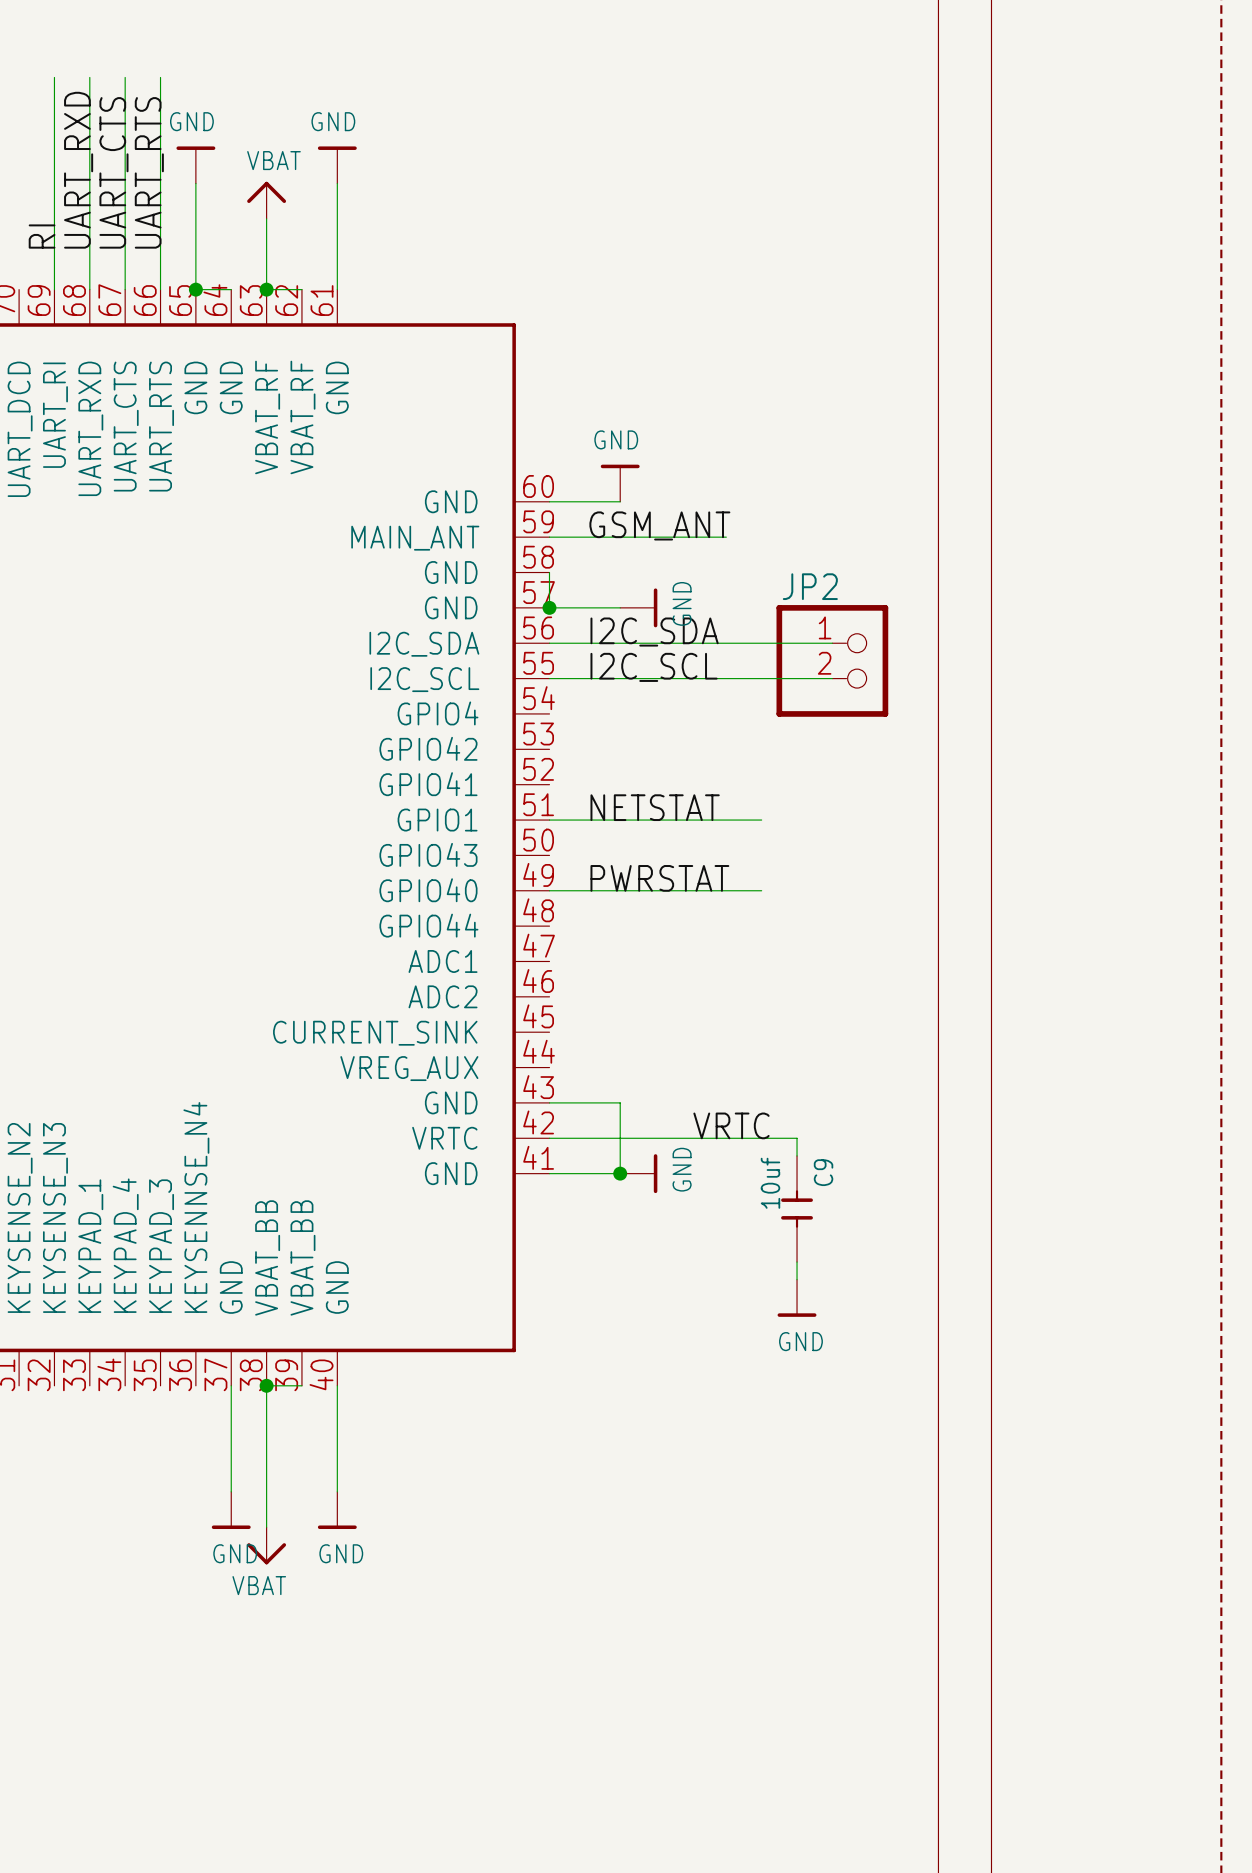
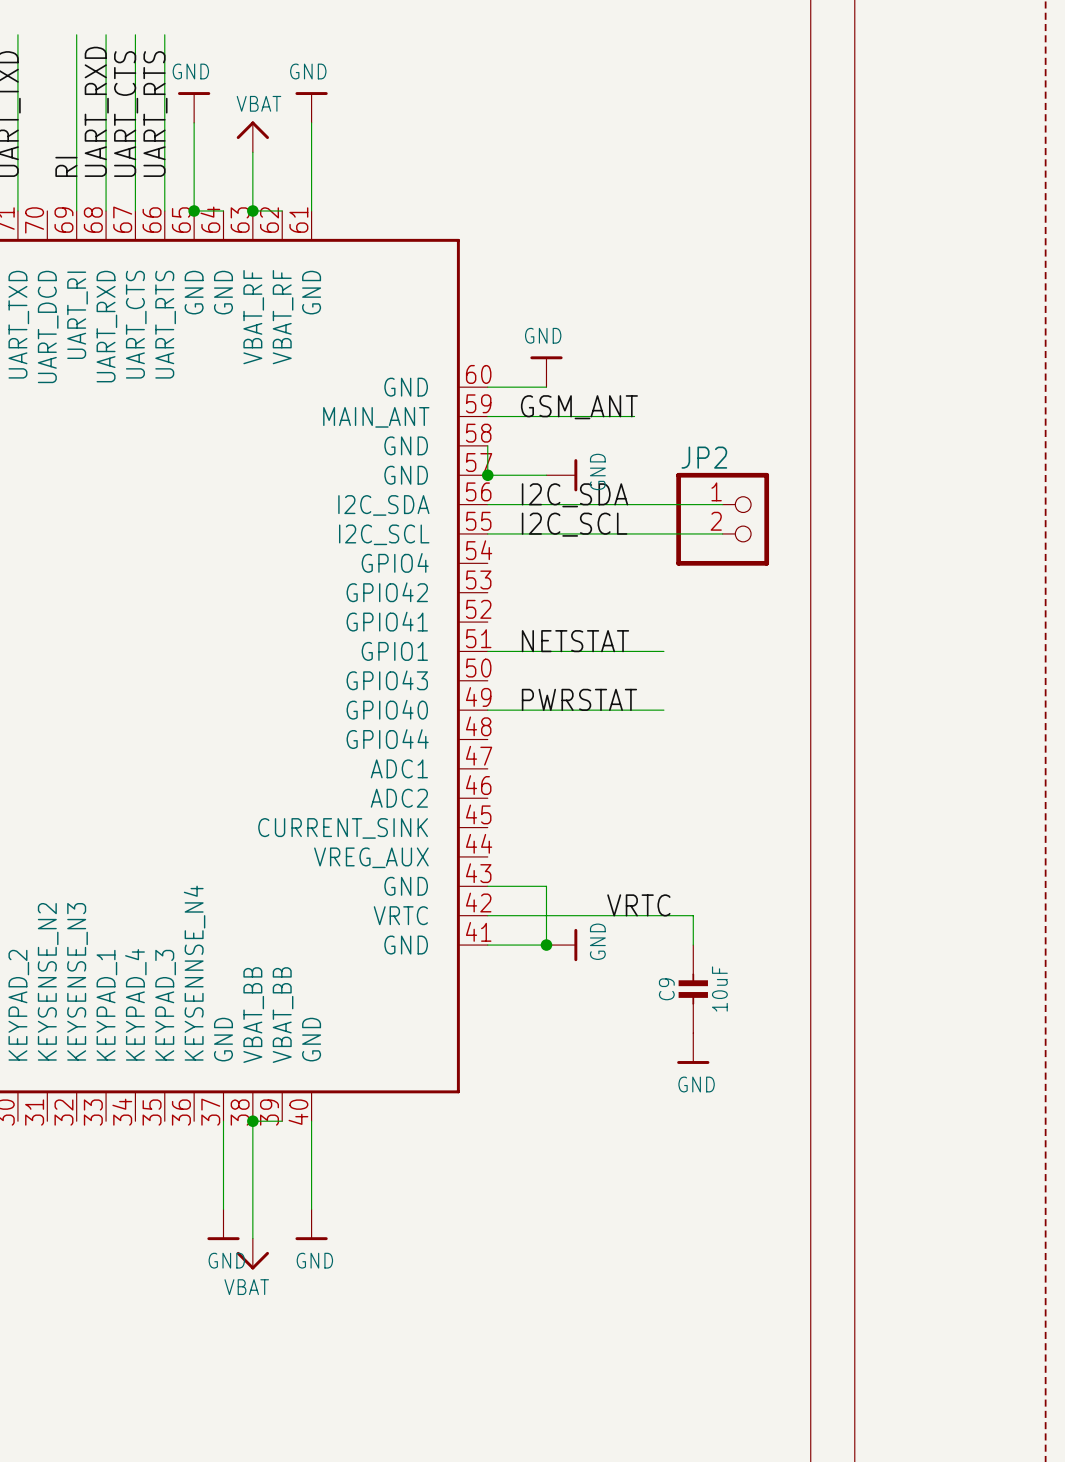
C9 symbol: [781, 1155, 813, 1263] -> [678, 945, 708, 1034]
C9 name position: C9 (823, 1172) -> C9 (666, 989)
C9 value: 10uf (770, 1183) -> 10uF (719, 989)

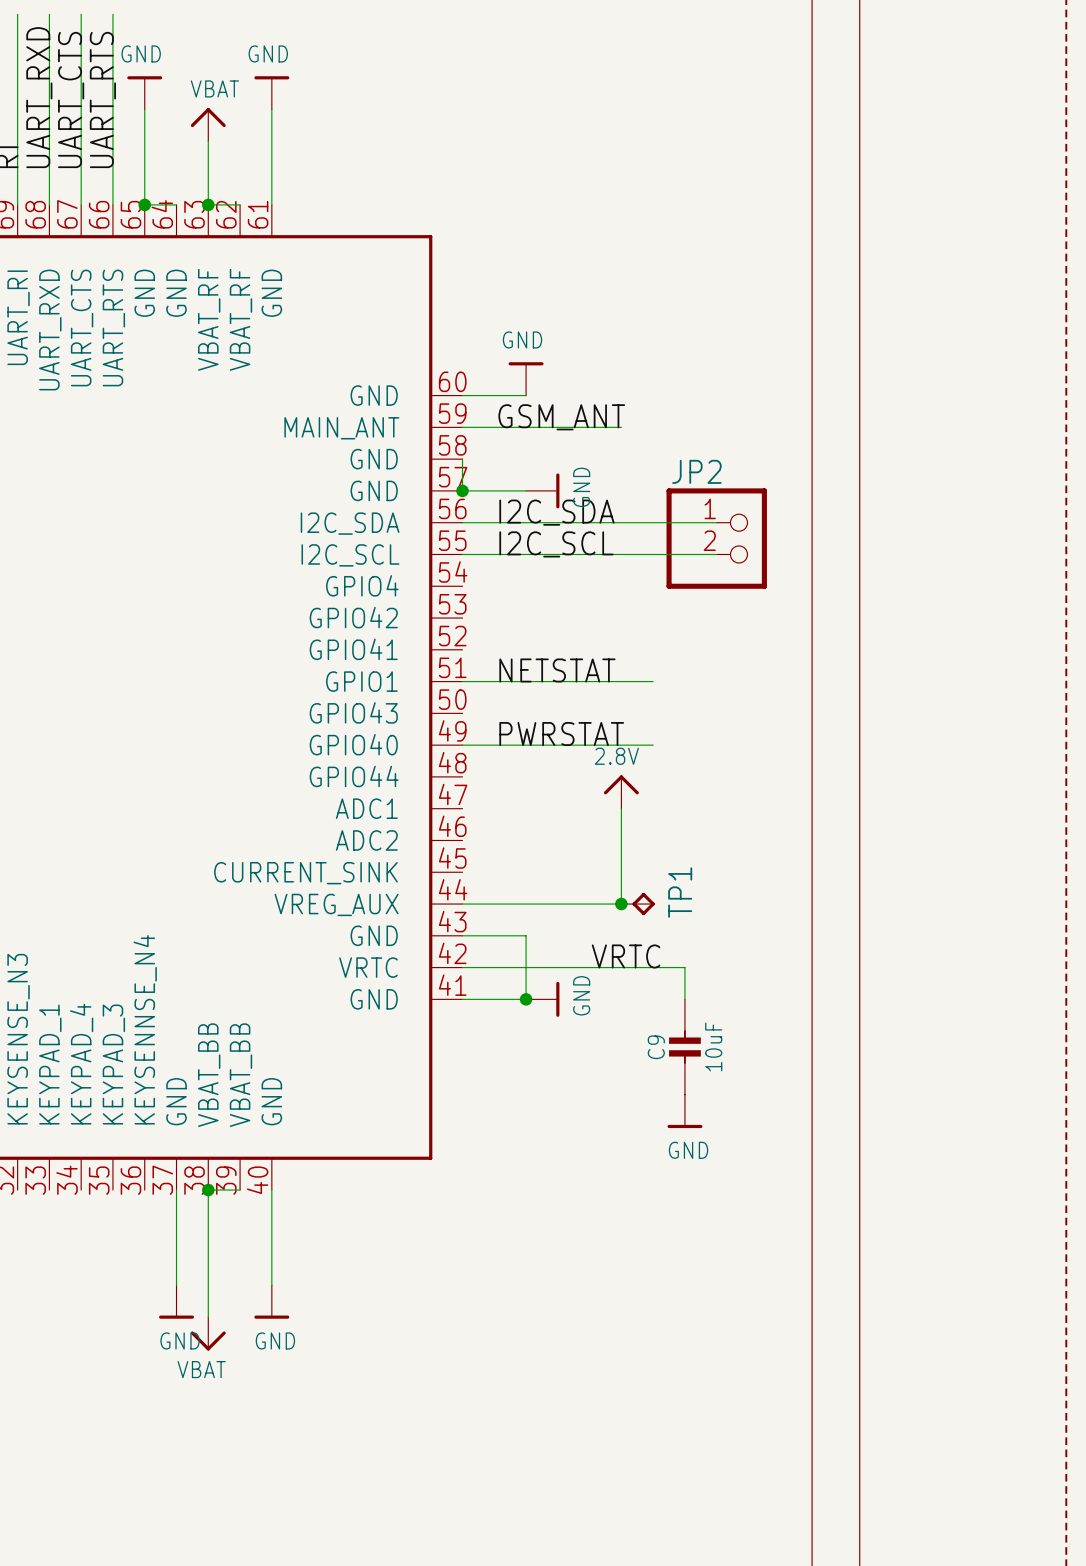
power symbol: none -> 2.8V (621, 792)
wire: none -> (621, 808) (621, 904) (462, 904)
junction: none -> (621, 904)
TP1: none -> (638, 904)

